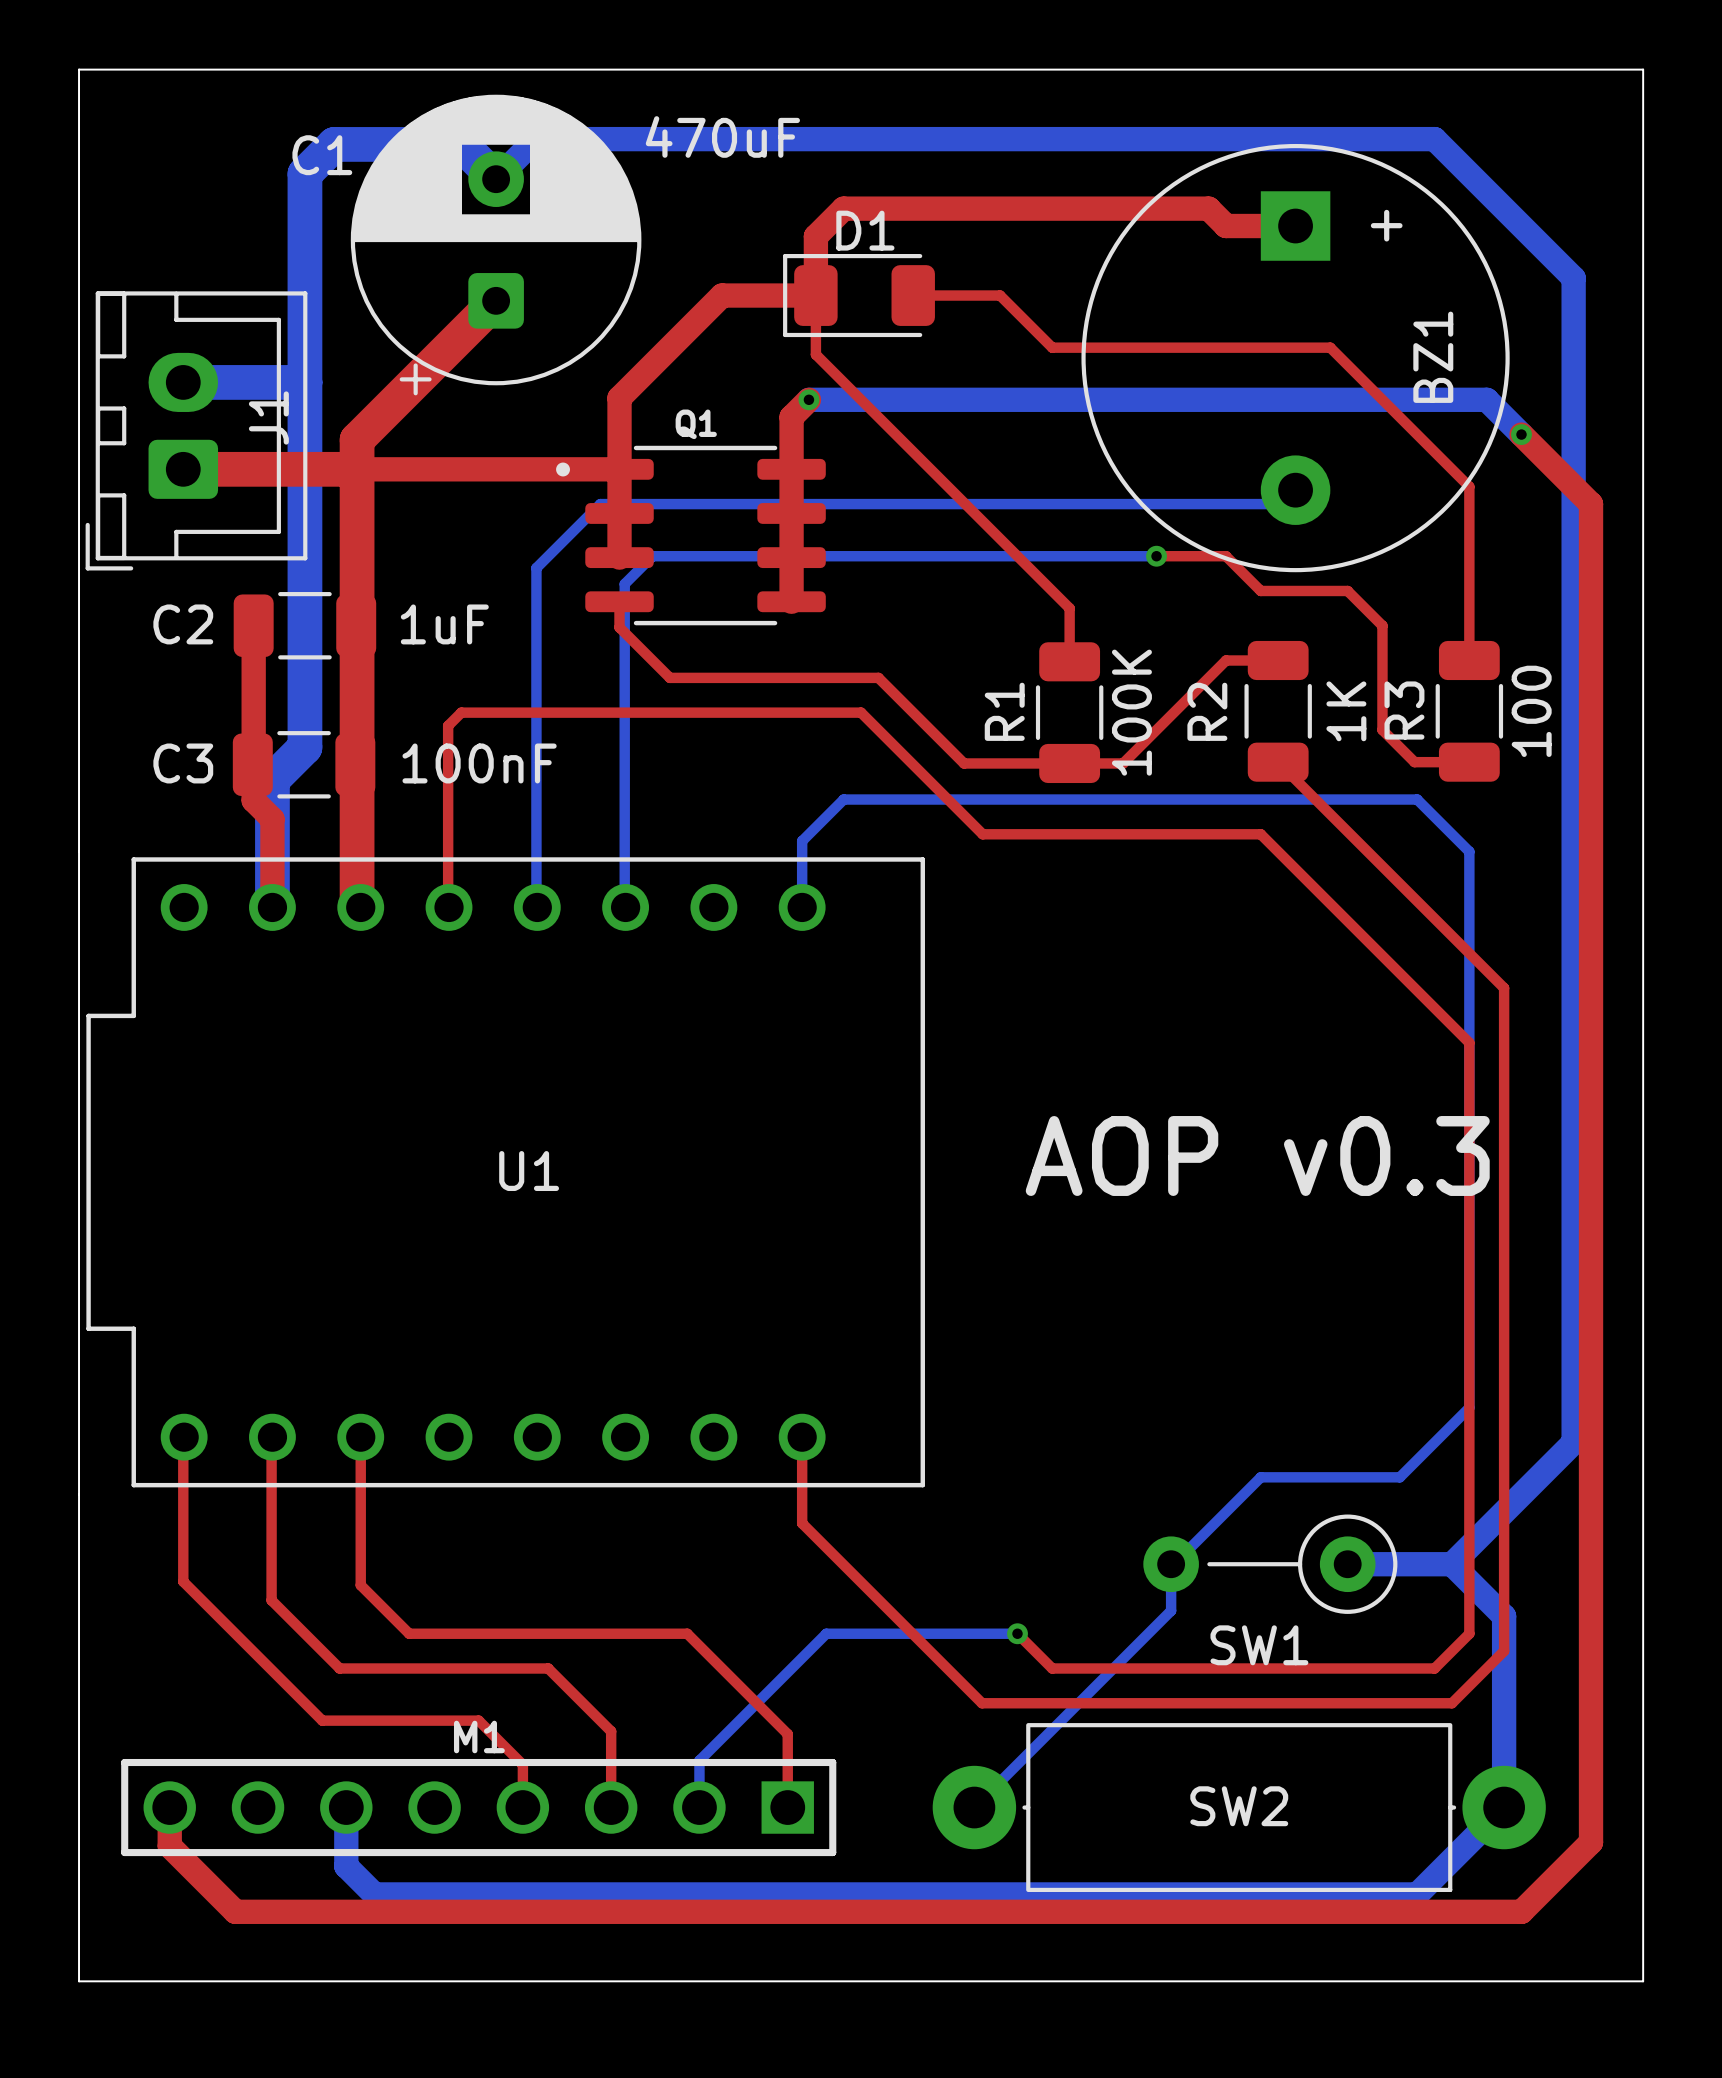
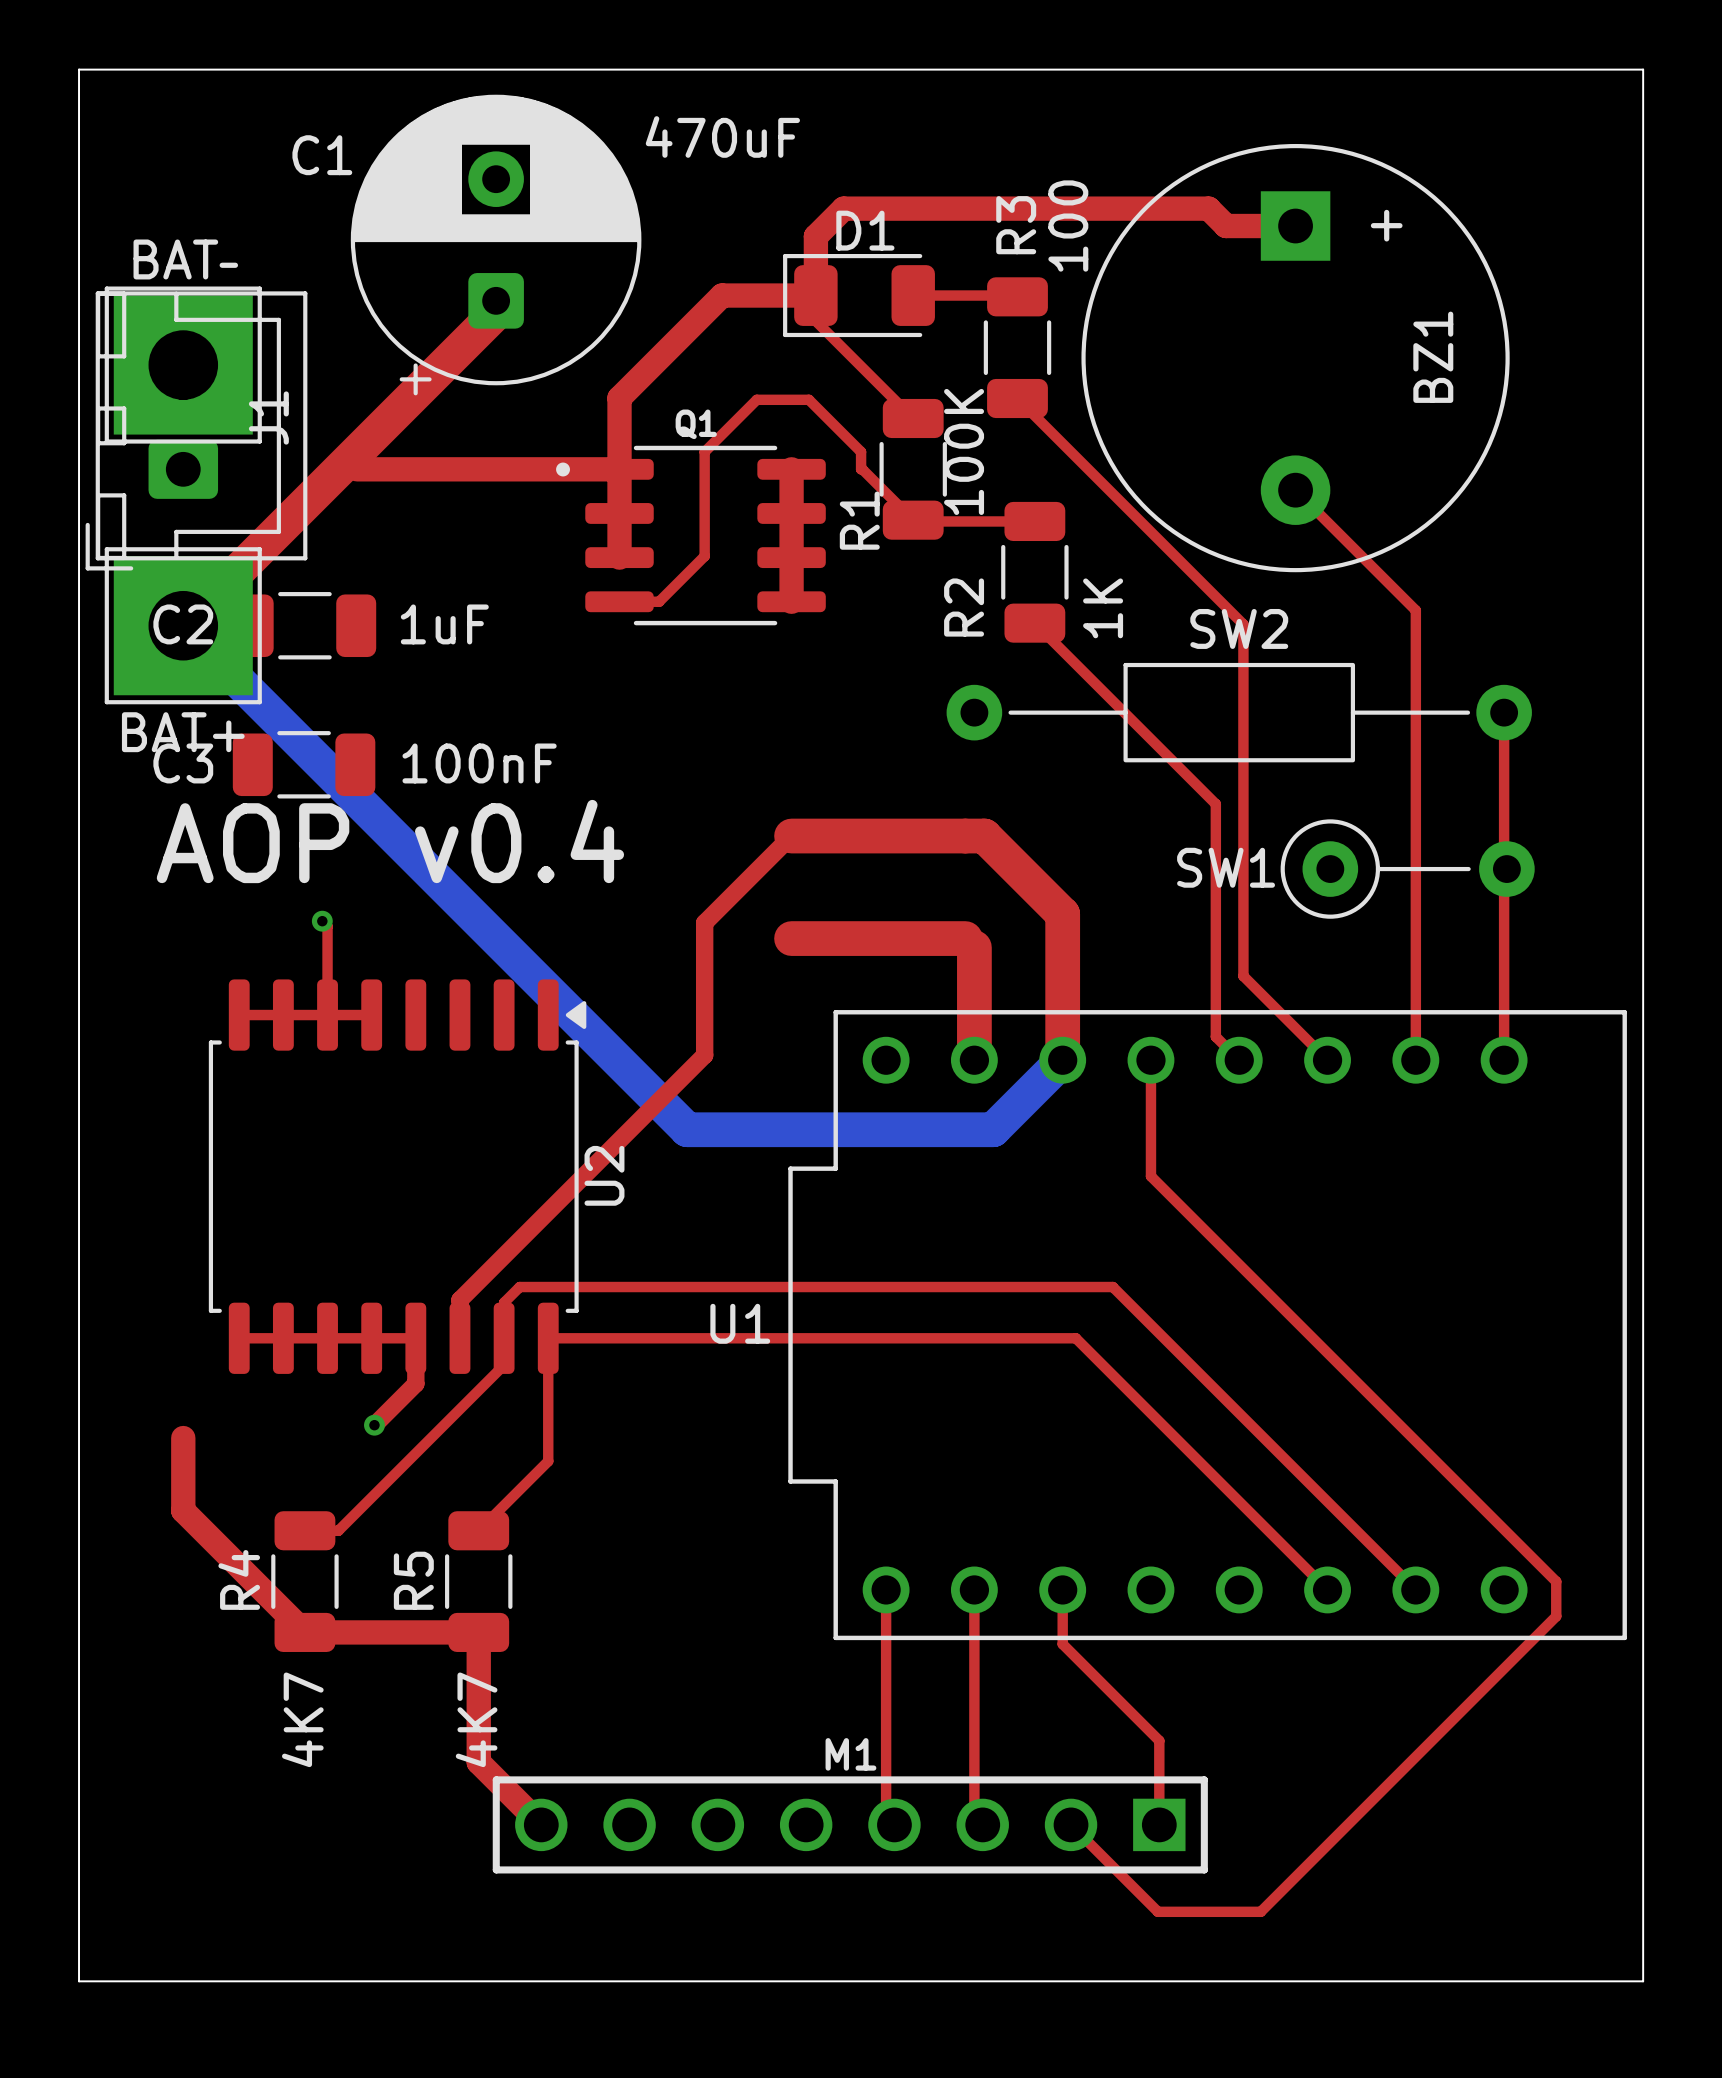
top track: (1000, 295) (1052, 347) (1330, 347) (1469, 486) (1469, 660) -> none
top track: (496, 300) (357, 439) (357, 903) -> (496, 300) (496, 312) (183, 625)
top track: (815, 321) (815, 354) (1069, 608) (1069, 661) -> (815, 321) (913, 418)
part: none -> BAT– (183, 365)
bottom track: (183, 382) (304, 382) -> none
top track: none -> (1017, 398) (1243, 624) (1243, 976) (1327, 1060)
top track: (808, 399) (791, 417) (791, 469) -> none
bottom track: (808, 399) (1486, 399) (1521, 434) -> none
via: (808, 399) -> none
top track: (1521, 434) (1591, 504) (1591, 1842) (1521, 1911) (1260, 1911) -> (1150, 1060) (1150, 1176) (1556, 1581) (1556, 1616) (1260, 1911)
via: (1521, 434) -> none
top track: (183, 469) (357, 469) -> none
top track: none -> (1295, 490) (1415, 610) (1415, 1060)
bottom track: (1295, 490) (1281, 504) (600, 504) (536, 568) (537, 907) -> none
top track: (1156, 556) (1226, 556) (1260, 590) (1347, 590) (1382, 625) (1382, 730) (1414, 762) (1469, 762) -> none
bottom track: (1156, 556) (652, 556) (624, 584) (625, 907) -> none
via: (1156, 556) -> none
top track: (619, 601) (619, 627) (669, 677) (878, 677) (964, 763) (1123, 763) (1226, 660) (1278, 660) -> (619, 601) (659, 601) (704, 556) (704, 451) (756, 399) (808, 399) (861, 451) (861, 469) (913, 520) (1034, 521)
top track: none -> (1034, 623) (1215, 804) (1215, 1036) (1239, 1060)
bottom track: none -> (183, 625) (687, 1129) (993, 1129) (1062, 1060)
part: none -> BAT+ (183, 625)
top track: (253, 625) (253, 800) (272, 819) (272, 907) -> none
R3 name position: R3 (1404, 710) -> R3 (1016, 225)
R1 name position: R1 (1004, 711) -> R1 (859, 520)
R2 name position: R2 (1207, 711) -> R2 (964, 607)
R2 position: (1278, 711) -> (1034, 572)
R2 value position: 1K (1346, 711) -> 1K (1103, 608)
R3 position: (1469, 711) -> (1017, 347)
R3 value position: 100 (1531, 711) -> 100 (1068, 226)
R1 position: (1069, 712) -> (913, 469)
R1 value position: 100K (1131, 712) -> 100K (964, 451)
top track: (1278, 762) (1504, 988) -> (1504, 712) (1504, 988)
text: none -> AOP v0.4 (390, 841)
bottom track: (272, 907) (272, 779) (304, 747) (304, 173) (334, 144) (461, 144) (496, 179) (536, 139) (1434, 139) (1573, 278) (1573, 1442) (1451, 1564) -> none
top track: (449, 907) (448, 725) (461, 712) (861, 712) (982, 834) (1260, 834) (1469, 1042) (1469, 1633) (1434, 1668) (1052, 1668) (1017, 1633) -> none
bottom track: (802, 907) (802, 841) (843, 799) (1417, 799) (1469, 851) (1469, 1407) (1399, 1477) (1260, 1477) (1173, 1564) (1171, 1564) (1171, 1610) (974, 1807) -> none
top track: none -> (322, 921) (327, 926) (327, 1015)
via: none -> (322, 921)
top track: none -> (791, 938) (965, 938) (974, 947) (974, 1060)
top track: none -> (239, 1015) (371, 1015)
top track: none -> (1062, 1060) (1062, 914) (984, 836) (791, 836) (704, 922) (704, 1055) (459, 1299) (459, 1338)
top track: (1504, 1060) (1504, 1651) (1451, 1703) (982, 1703) (802, 1523) (802, 1437) -> none
text: AOP v0.3 (1257, 1155) -> none
U1 name position: U1 (529, 1171) -> U1 (740, 1323)
U1 position: (505, 1172) -> (1207, 1325)
U2: none -> (397, 1176)
top track: none -> (239, 1338) (415, 1338) (415, 1383) (374, 1425)
via: none -> (374, 1425)
top track: (272, 1437) (271, 1600) (339, 1668) (548, 1668) (611, 1731) (611, 1807) -> none
top track: (360, 1437) (360, 1585) (409, 1633) (687, 1633) (787, 1734) (787, 1807) -> none
top track width: thin (183, 1438) (183, 1510) -> thick (183, 1438) (183, 1510)
top track: (183, 1510) (183, 1581) (322, 1720) (478, 1720) (522, 1764) (522, 1807) -> (183, 1510) (304, 1632) (478, 1632) (478, 1762) (541, 1824)
top track: none -> (304, 1530) (338, 1530) (504, 1365) (504, 1302) (519, 1287) (1112, 1287) (1415, 1589)
top track: none -> (478, 1530) (548, 1461) (548, 1338) (1075, 1338) (1327, 1589)
SW1 rotation: 0° (1270, 1564) -> 180° (1407, 869)
SW1 position: (1270, 1564) -> (1407, 869)
bottom track: (1347, 1564) (1451, 1564) -> none
bottom track: (1451, 1564) (1504, 1616) (1504, 1807) (1417, 1894) (374, 1894) (346, 1866) (346, 1807) -> none
R4: none -> 4K7 (304, 1581)
R5: none -> 4K7 (478, 1581)
top track: none -> (886, 1589) (886, 1816) (894, 1824)
top track: none -> (974, 1589) (974, 1816) (982, 1824)
top track: none -> (1062, 1603) (1062, 1644) (1159, 1740) (1159, 1824)
bottom track: (1017, 1633) (826, 1633) (699, 1760) (699, 1807) -> none
via: (1017, 1633) -> none
SW1 name position: SW1 (1259, 1645) -> SW1 (1226, 867)
SW2 footprint: [932, 1723, 1546, 1893] -> [946, 662, 1532, 763]
SW2 name position: SW2 (1239, 1806) -> SW2 (1239, 628)
top track: (169, 1807) (169, 1846) (235, 1911) (1157, 1911) -> (1071, 1824) (1157, 1911)
M1 position: (478, 1807) -> (850, 1824)
top track width: thick (1157, 1911) (1260, 1911) -> thin (1157, 1911) (1260, 1911)

